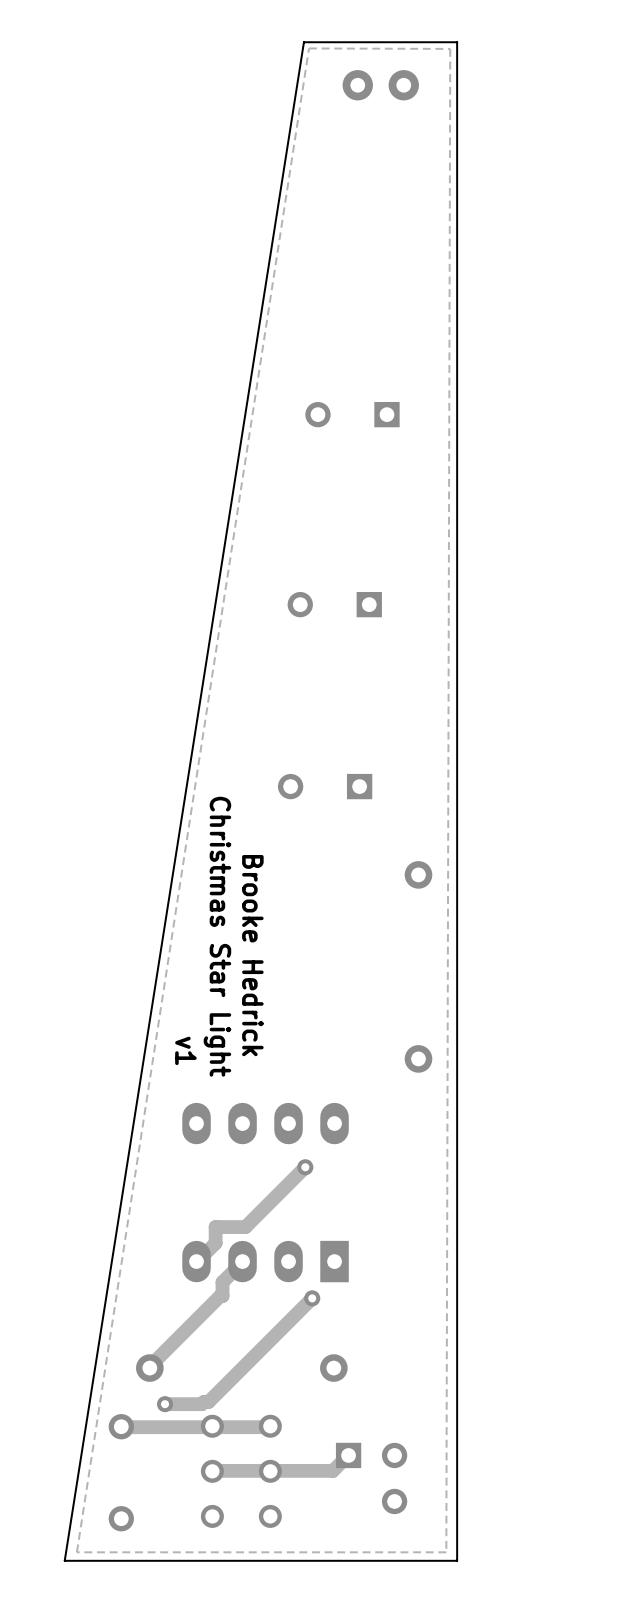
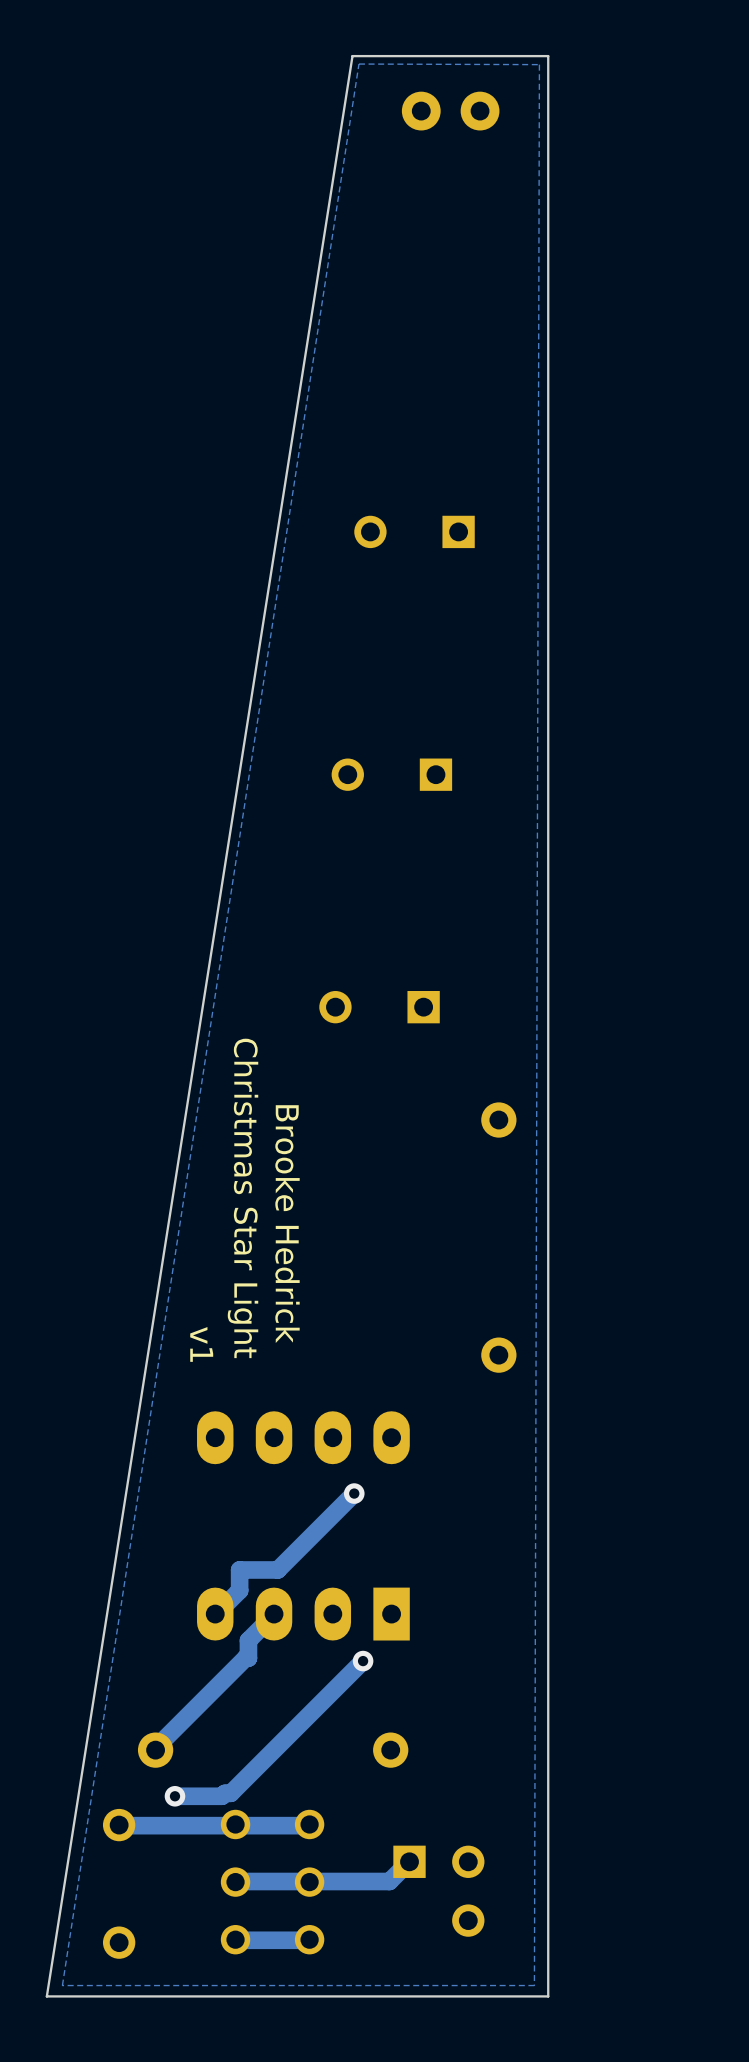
track: none -> (309, 1939) (235, 1939)

